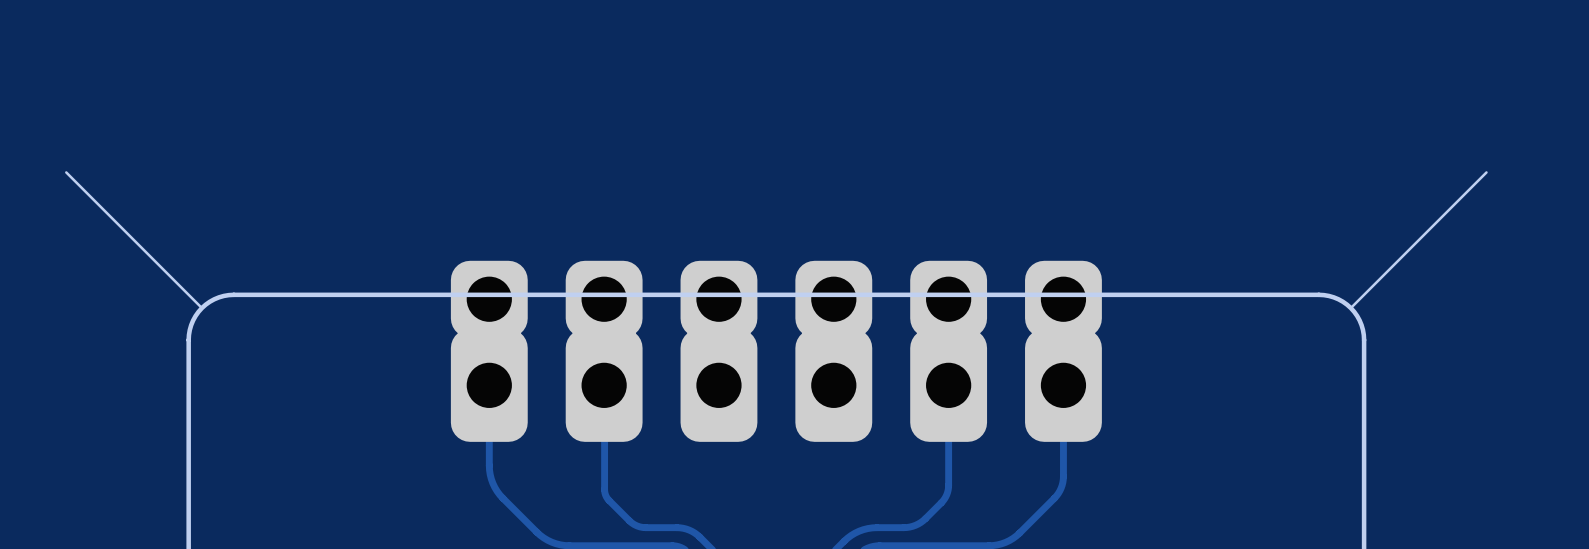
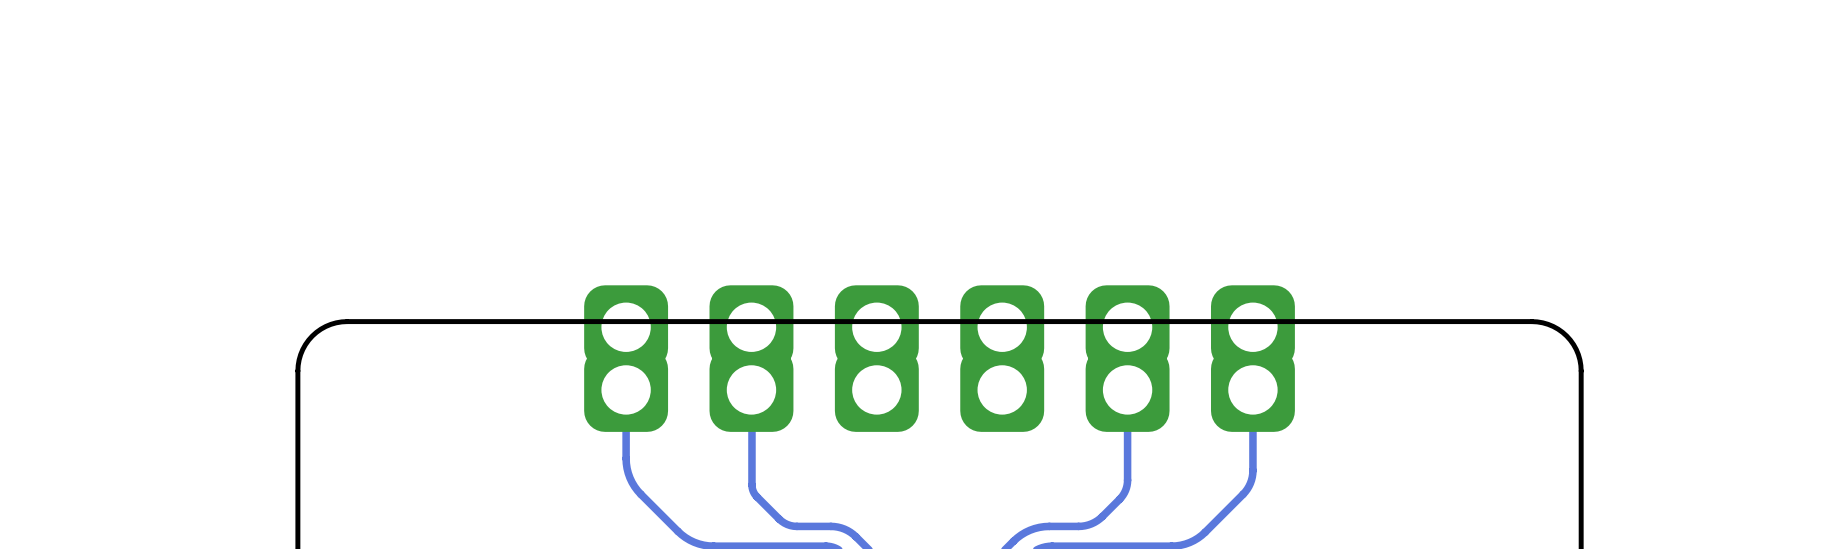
board edge: (66, 172) (201, 308) -> none
board edge: (1486, 172) (1350, 308) -> none
part footprint: [450, 260, 1102, 442] -> [584, 285, 1295, 432]
board edge: (1364, 385) (1363, 334) (1359, 320) (1350, 308) (1342, 301) (1328, 295) (1318, 294) (228, 295) (218, 297) (205, 304) (193, 320) (188, 334) (188, 385) -> (1581, 370) (1578, 354) (1566, 336) (1553, 326) (1531, 321) (347, 321) (330, 324) (312, 336) (302, 349) (297, 370)

